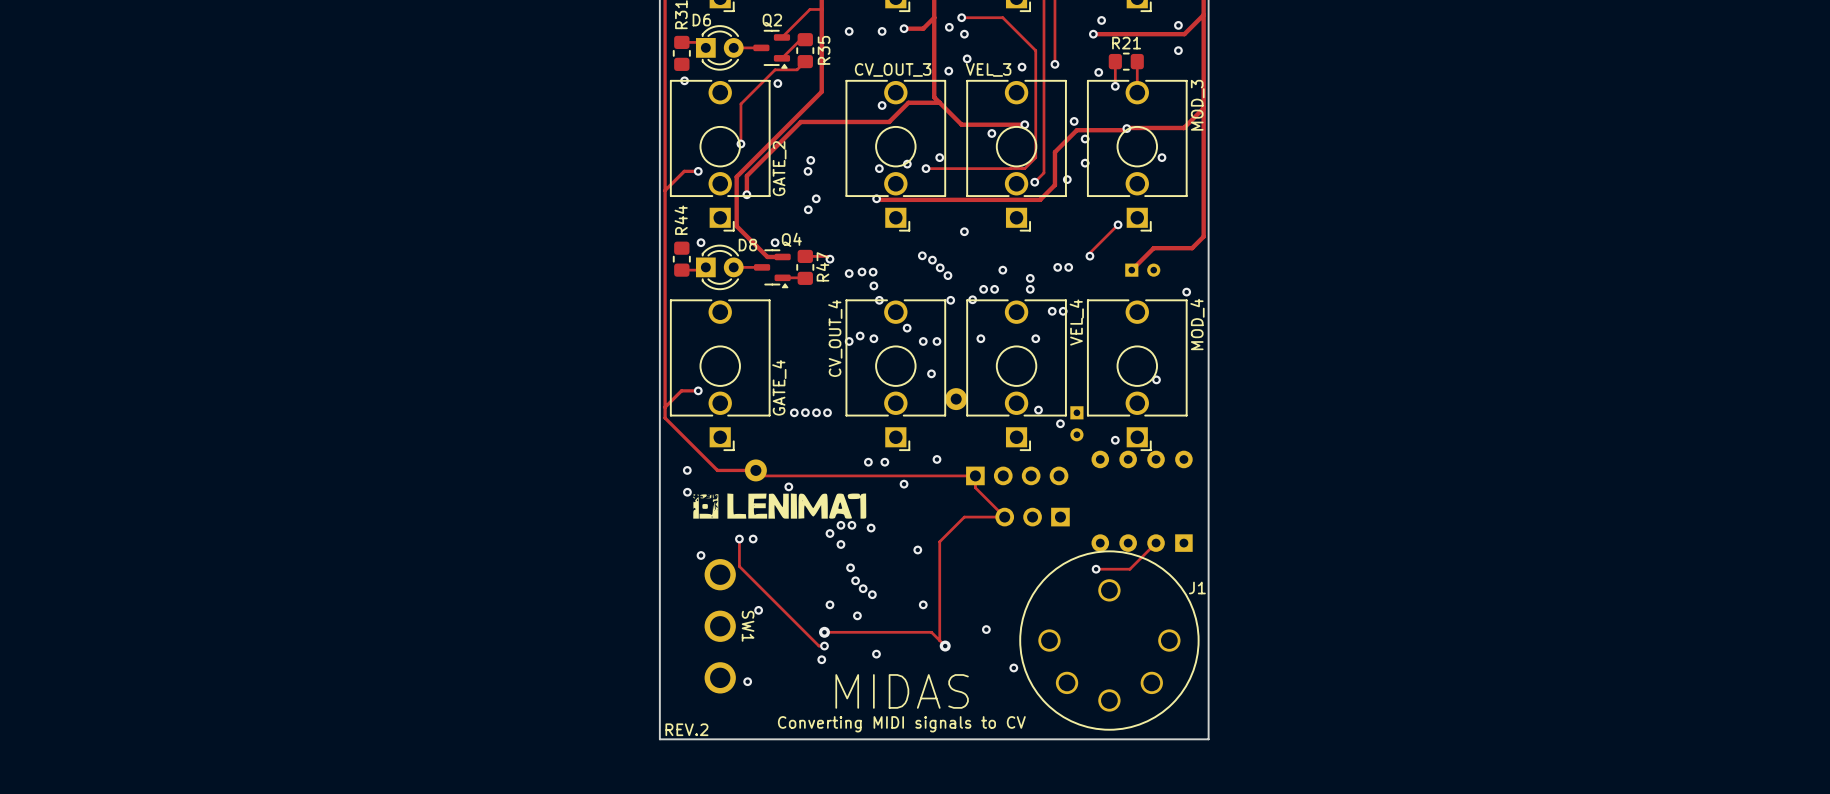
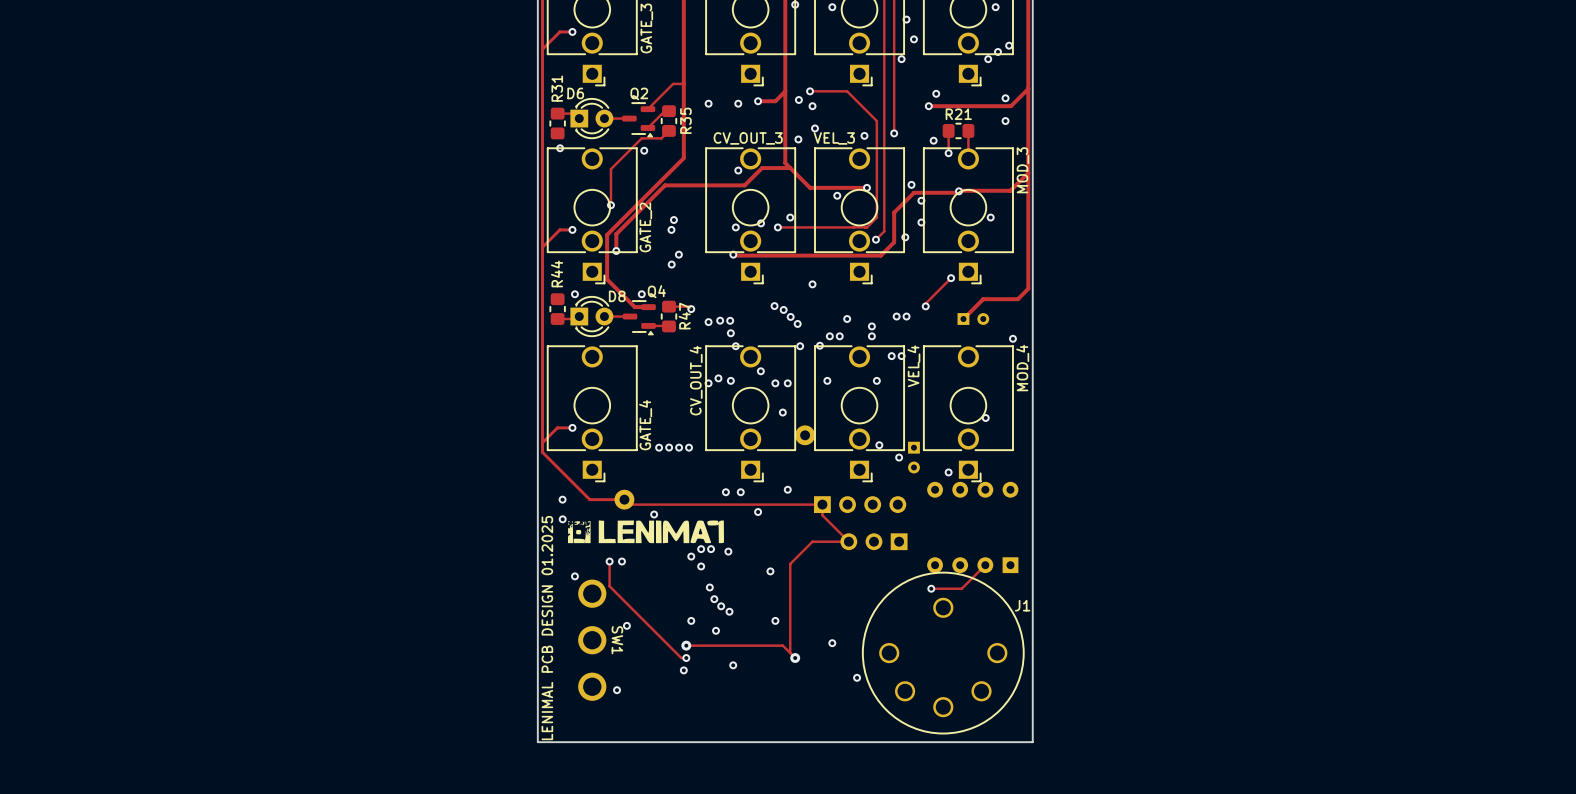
text: none -> LENIMAL PCB DESIGN 01.2025 (547, 628)
text: MIDAS (902, 691) -> none
text: Converting MIDI signals to CV (901, 724) -> none
text: REV.2 (686, 729) -> none

